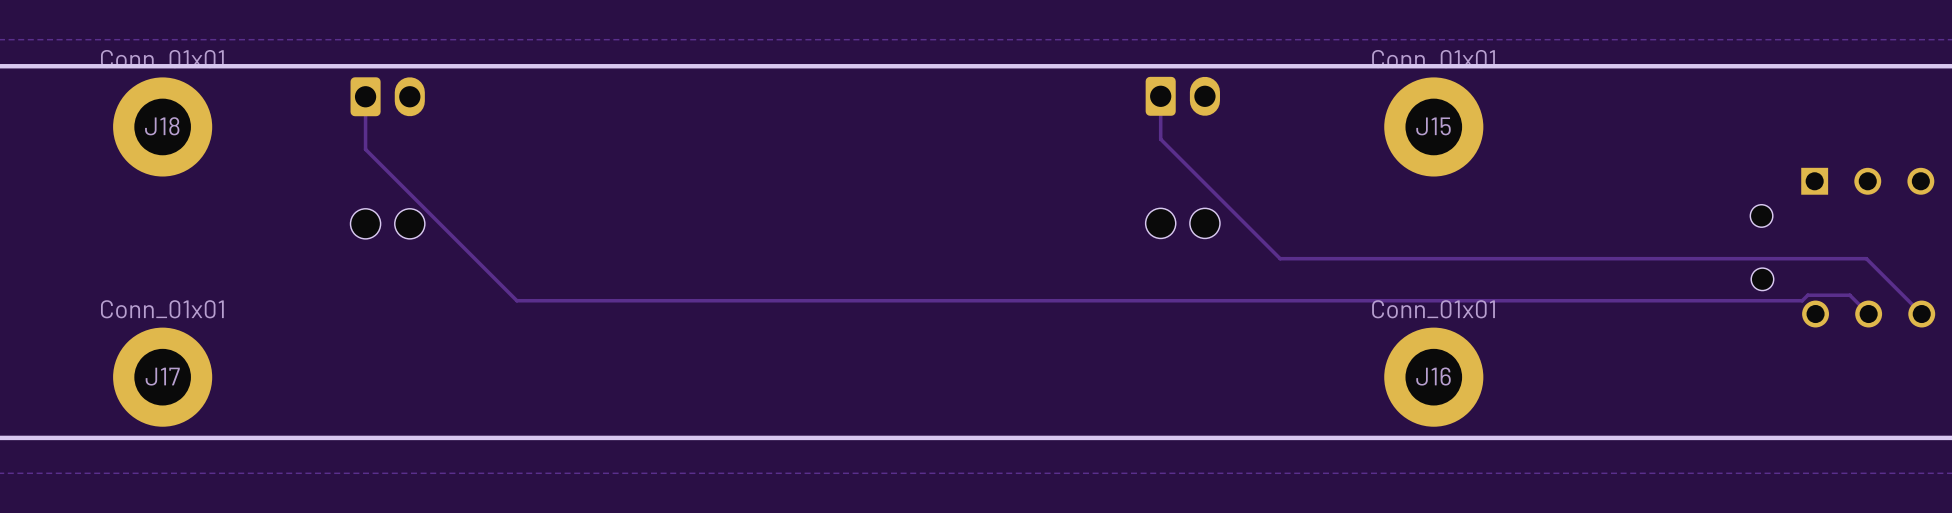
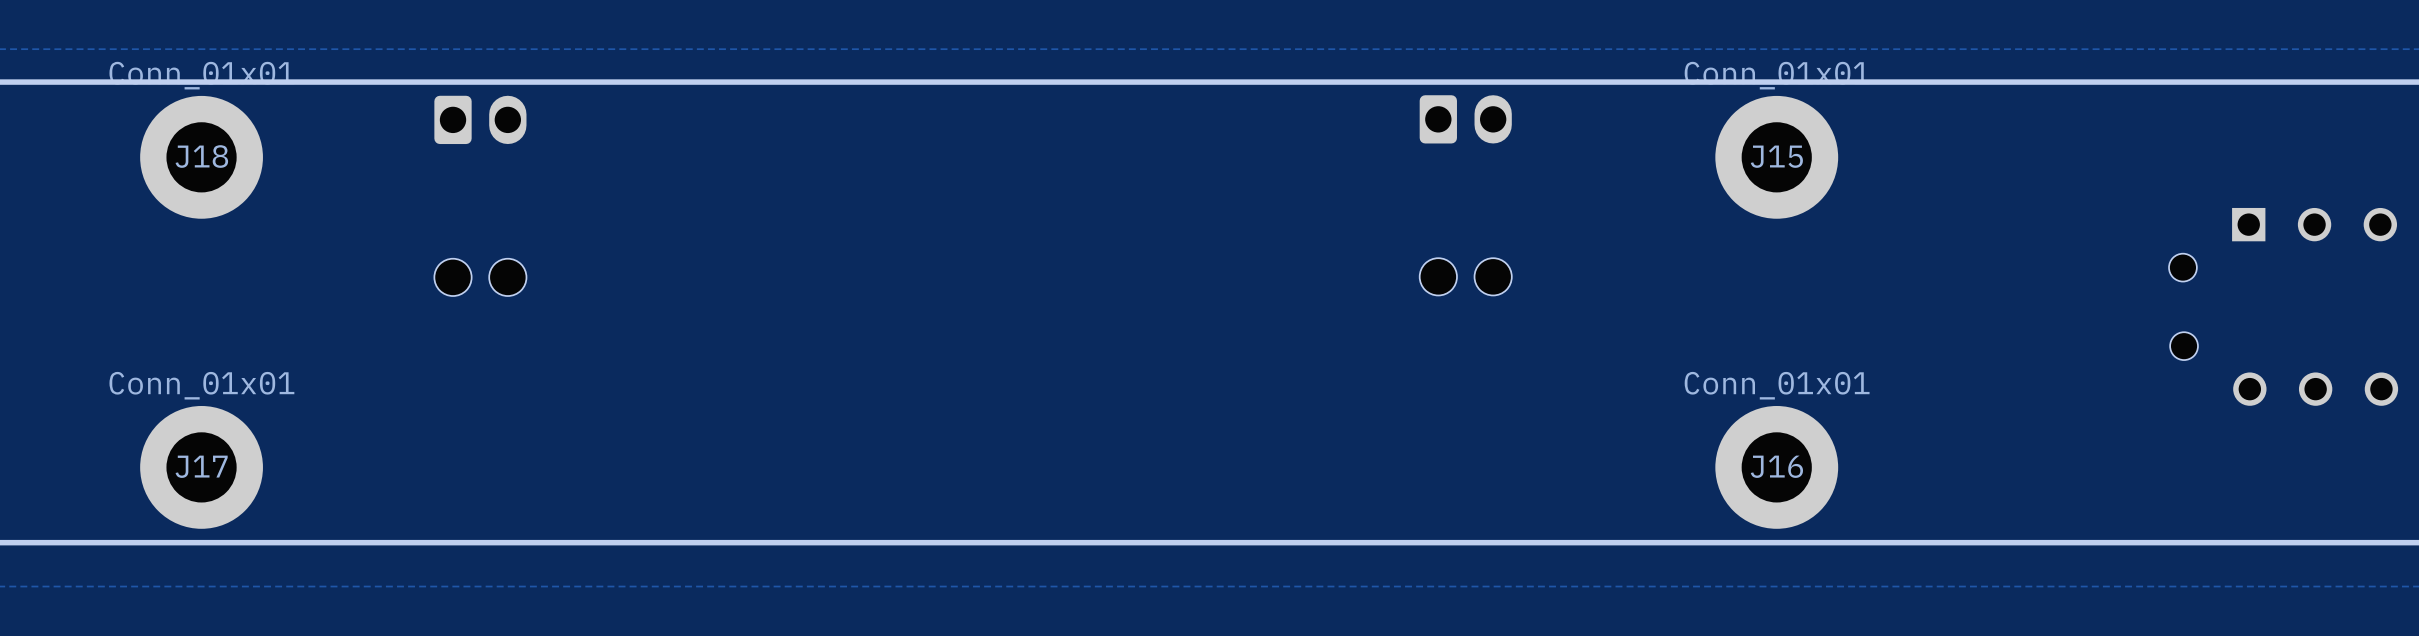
track: (365, 96) (365, 149) (516, 300) (1802, 300) (1807, 295) (1849, 295) (1868, 314) -> none
track: (1160, 96) (1160, 139) (1280, 258) (1866, 258) (1921, 314) -> none

